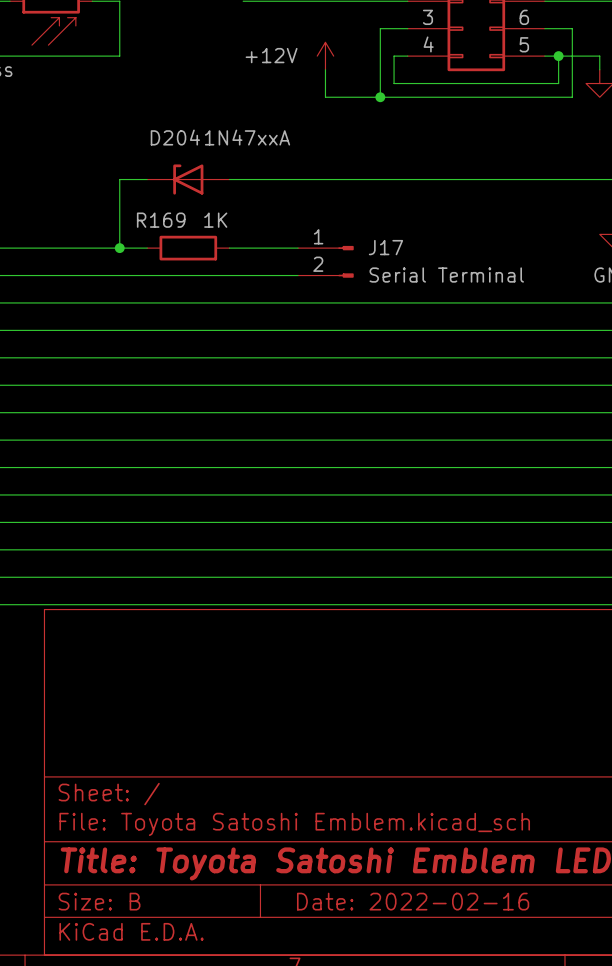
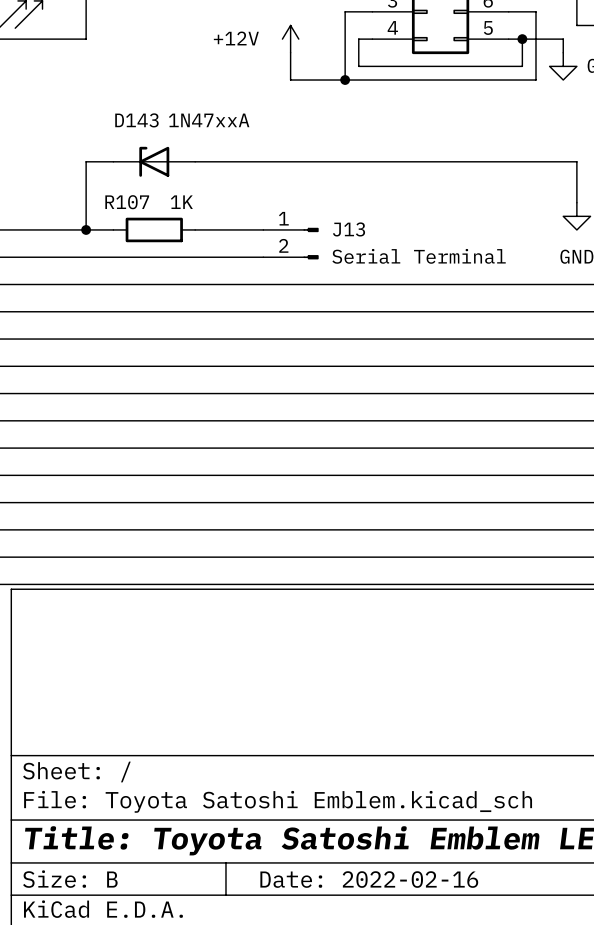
D204 name: D204 (175, 137) -> D143 (136, 120)
R169 name: R169 (161, 220) -> R107 (127, 202)
J17 name: J17 (385, 247) -> J13 (349, 229)

